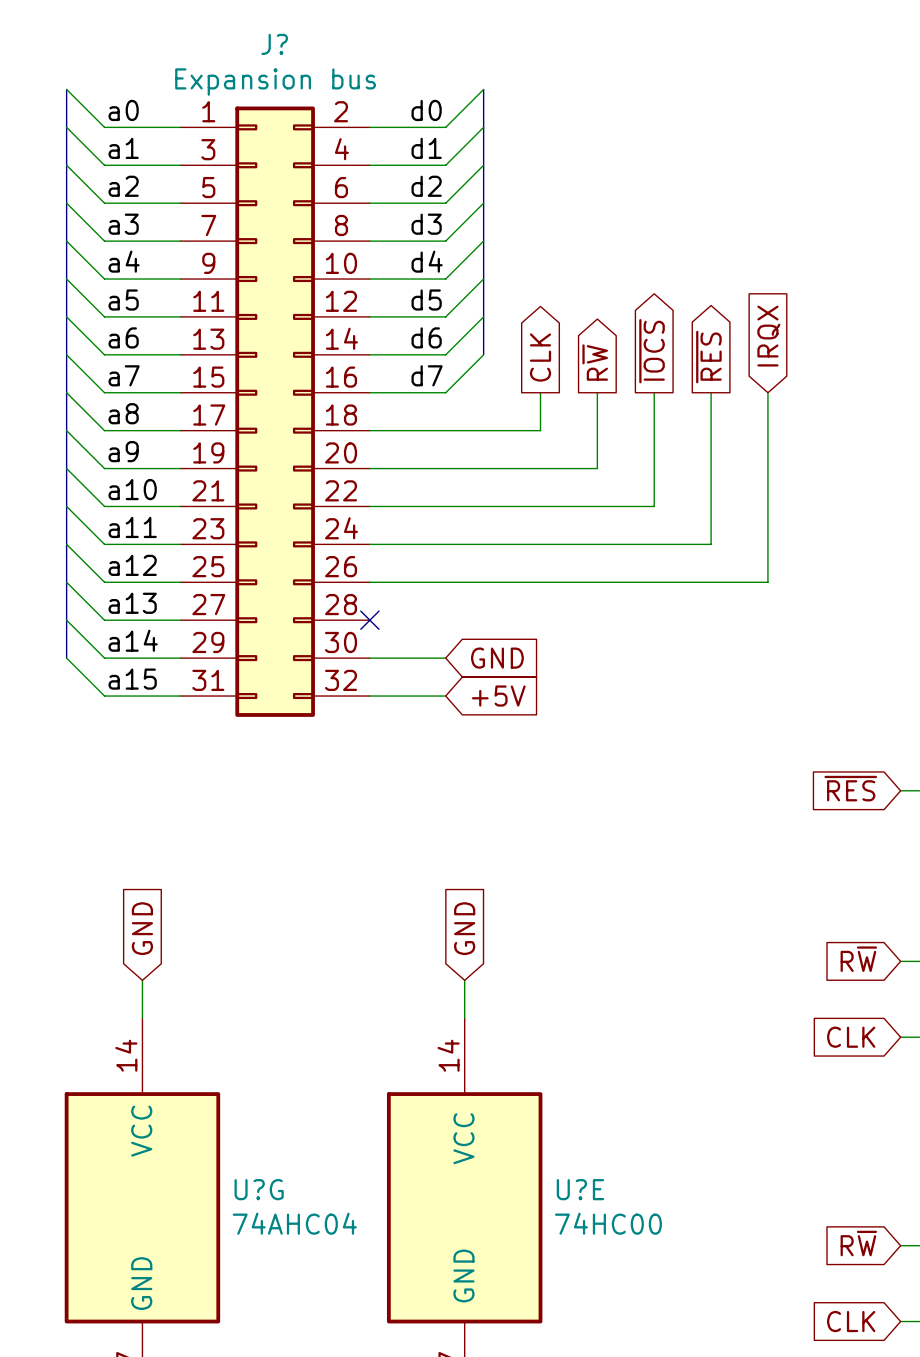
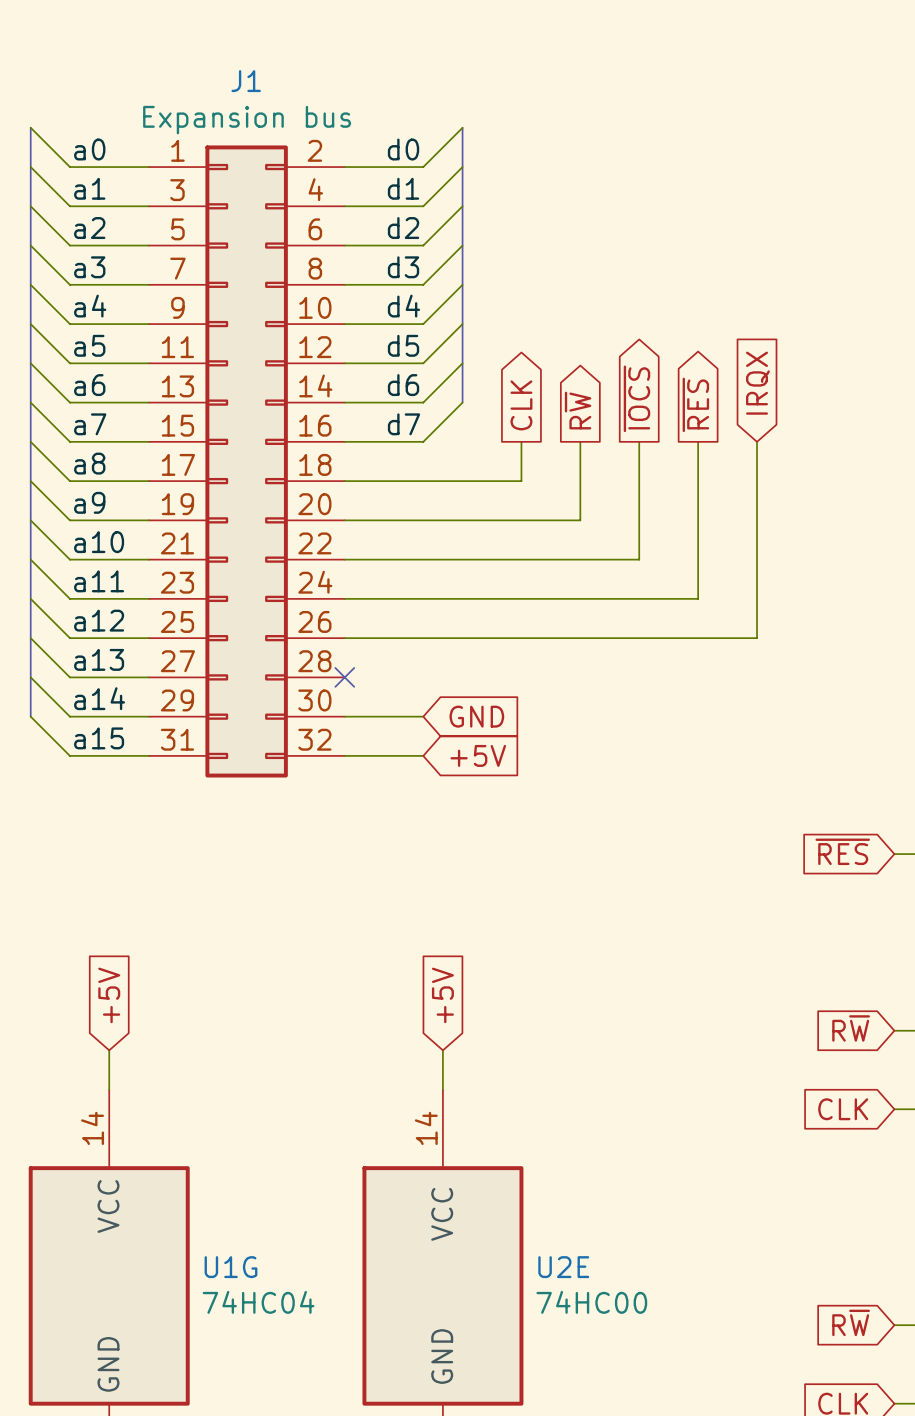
J? name: J? (274, 44) -> J1 (246, 81)
global label: GND (142, 928) -> +5V (109, 995)
global label: GND (464, 928) -> +5V (442, 995)
U?G name: U?G (259, 1189) -> U1G (230, 1267)
U?E name: U?E (580, 1189) -> U2E (563, 1267)
U?G value: 74AHC04 (294, 1223) -> 74HC04 (258, 1302)

